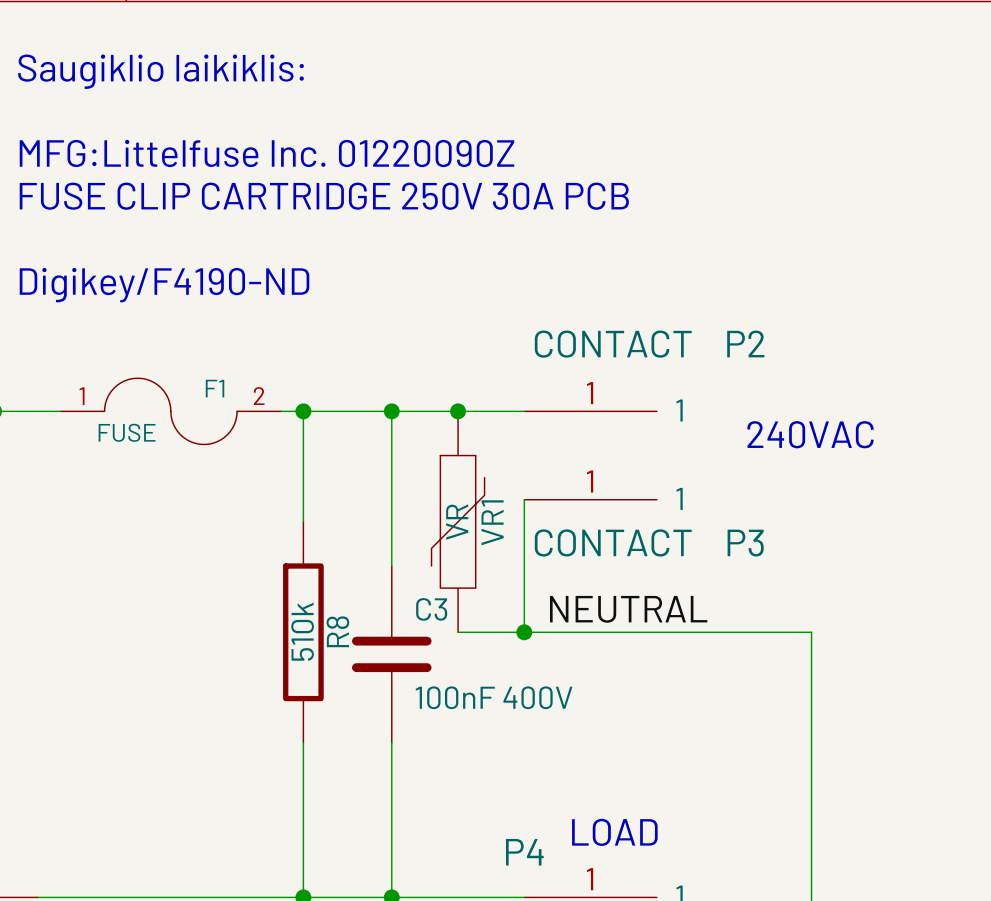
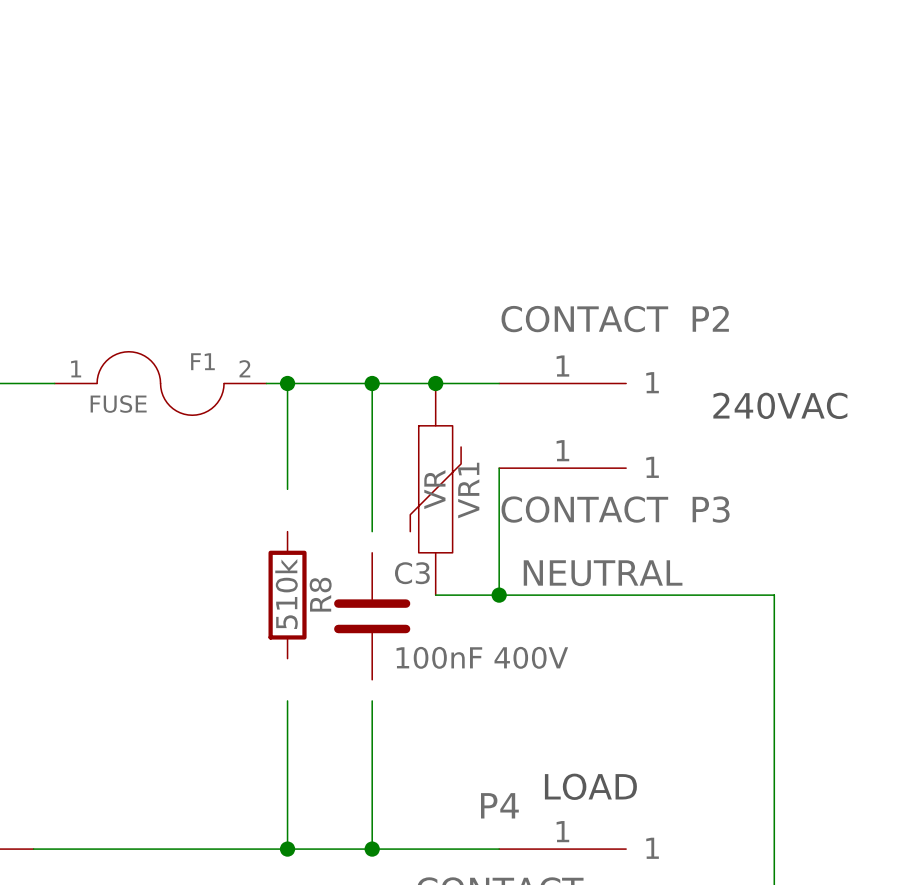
text: Saugiklio laikiklis: (161, 71) -> none
text: MFG:Littelfuse Inc. 01220090Z (266, 153) -> none
text: FUSE CLIP CARTRIDGE 250V 30A PCB (324, 196) -> none
text: Digikey/F4190-ND (164, 285) -> none
R8 symbol: [283, 521, 324, 743] -> [268, 531, 307, 659]
C3 symbol: [352, 566, 432, 743] -> [334, 552, 411, 680]

